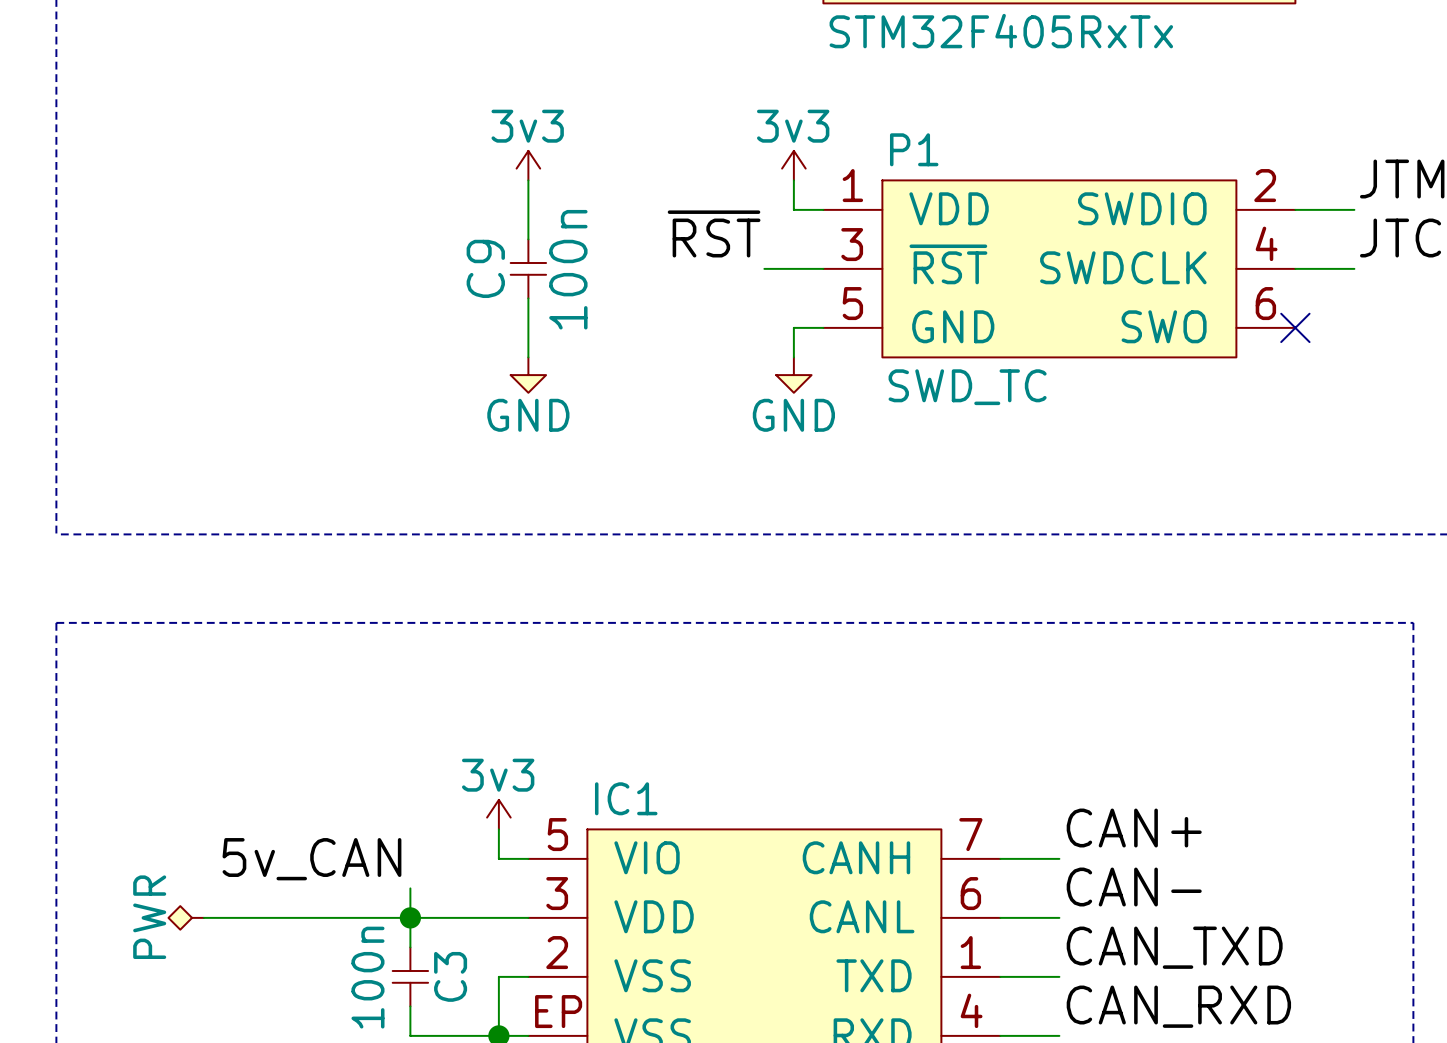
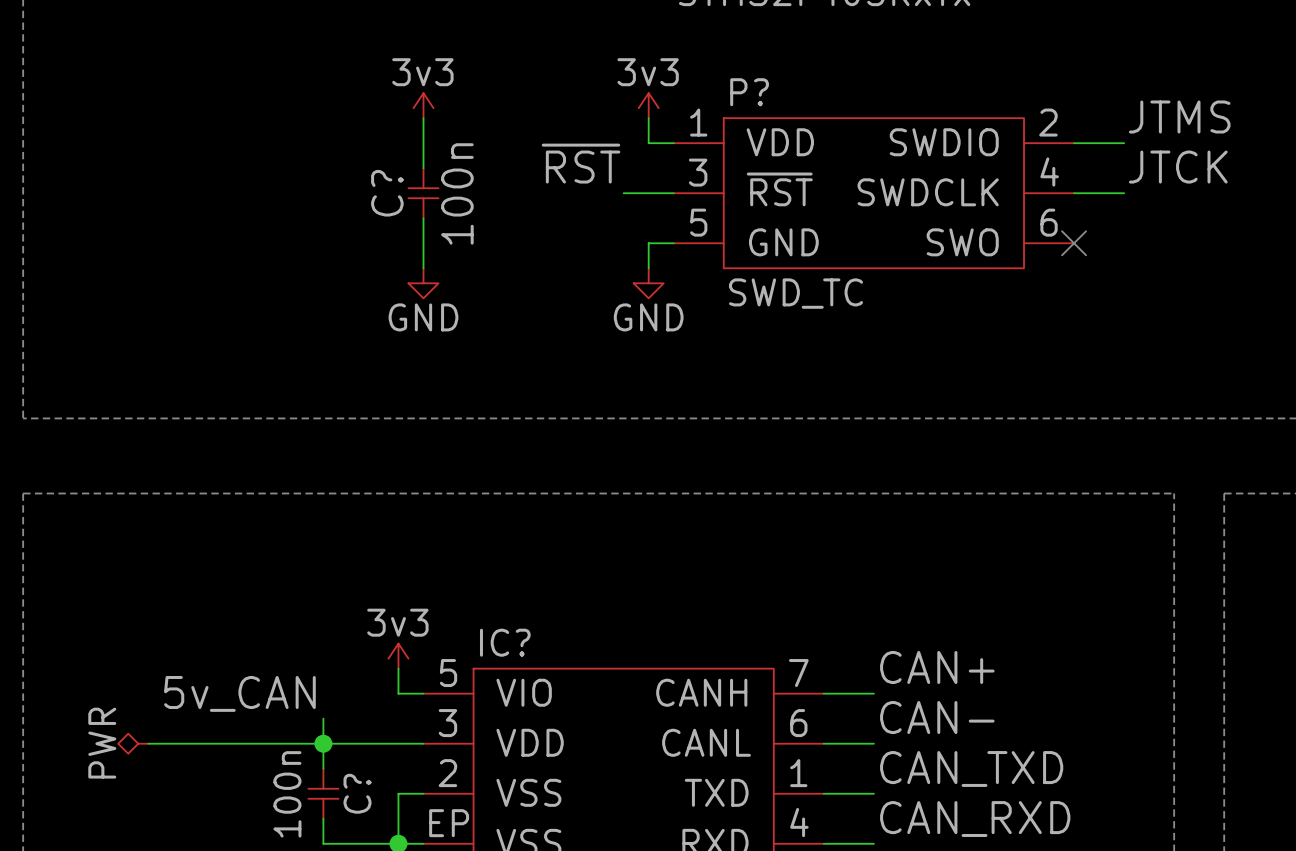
P1 name: P1 (914, 149) -> P? (749, 92)
C9 name: C9 (485, 268) -> C? (387, 193)
IC1 name: IC1 (626, 798) -> IC? (505, 642)
C3 name: C3 (450, 976) -> C? (357, 793)

